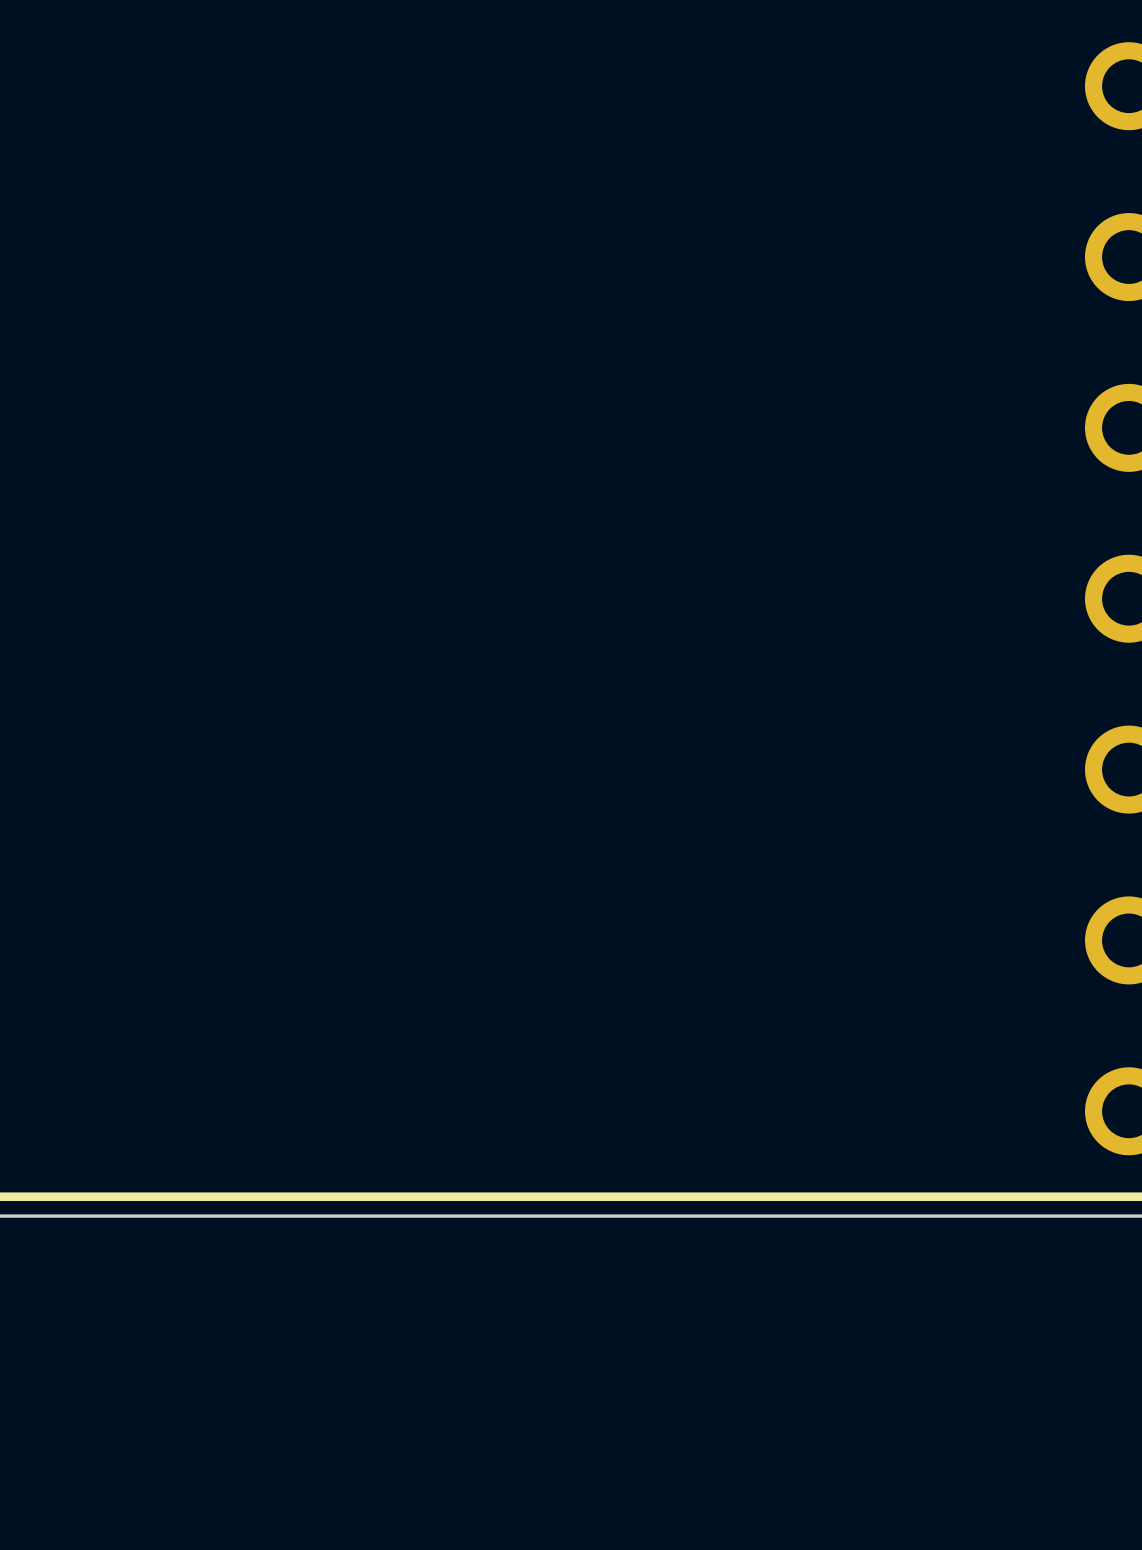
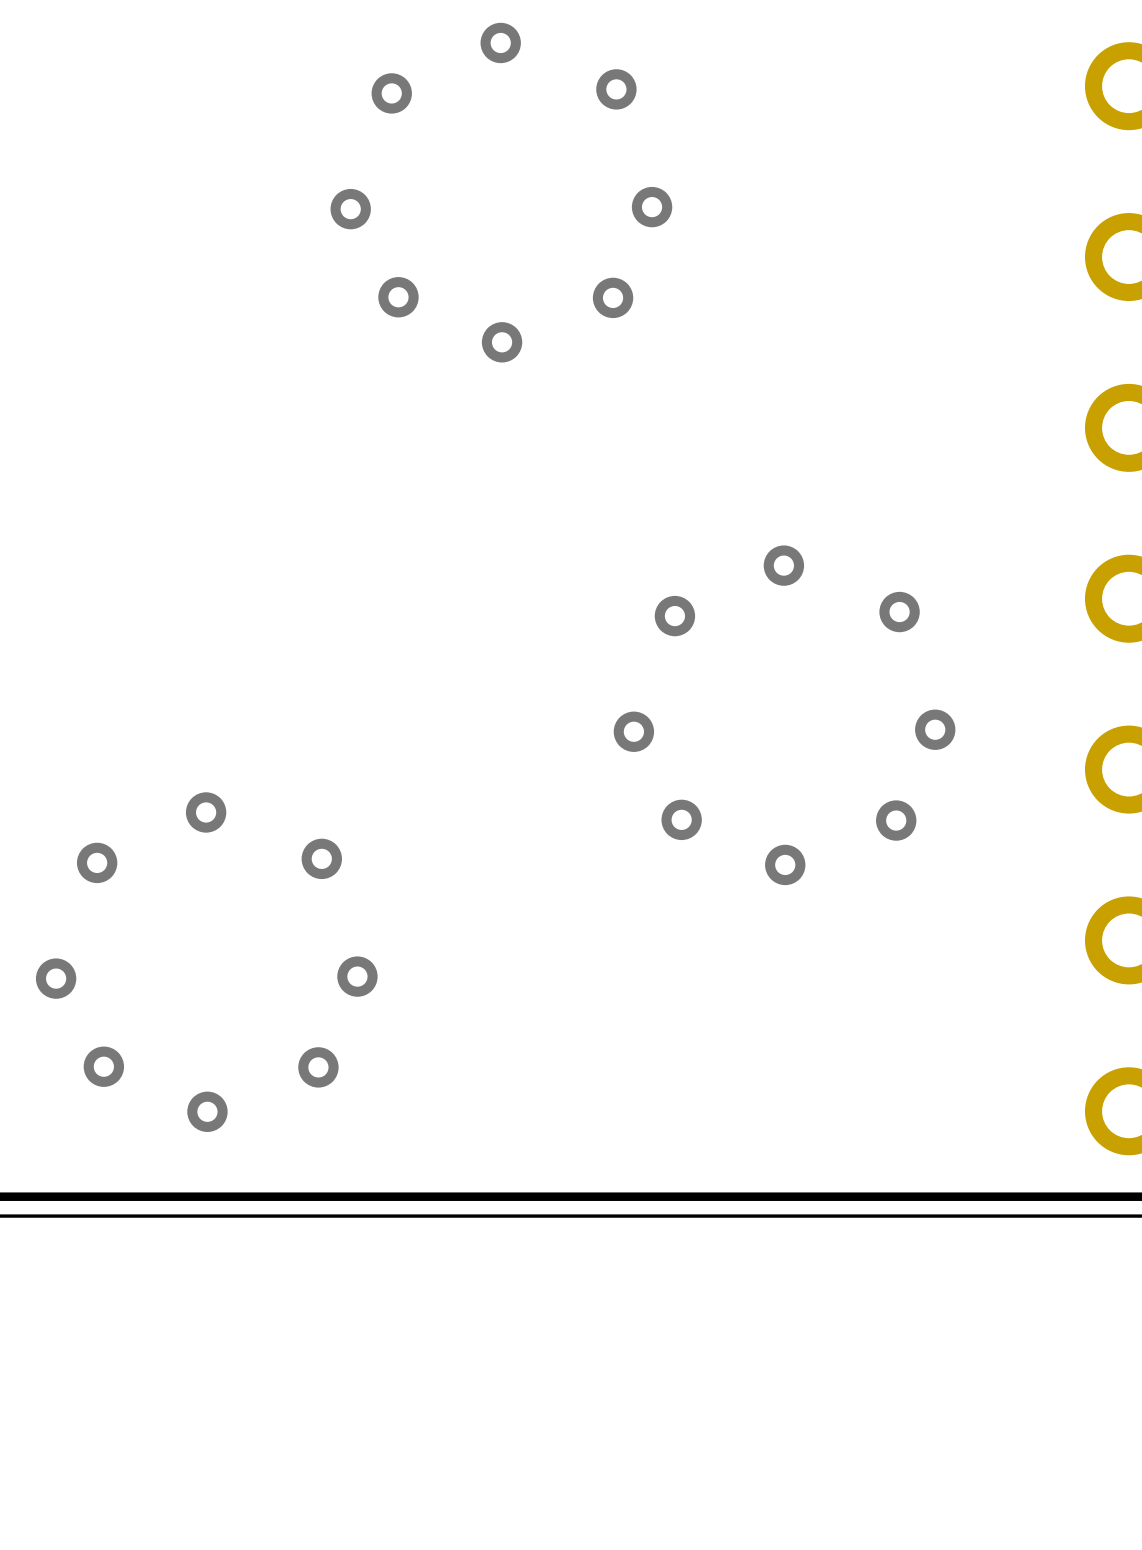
via: none -> (500, 42)
via: none -> (616, 89)
via: none -> (391, 93)
via: none -> (652, 207)
via: none -> (350, 209)
via: none -> (398, 297)
via: none -> (613, 297)
via: none -> (502, 342)
via: none -> (783, 565)
via: none -> (899, 612)
via: none -> (674, 616)
via: none -> (935, 729)
via: none -> (633, 731)
via: none -> (206, 812)
via: none -> (681, 819)
via: none -> (896, 820)
via: none -> (321, 858)
via: none -> (97, 862)
via: none -> (785, 864)
via: none -> (357, 976)
via: none -> (56, 978)
via: none -> (103, 1066)
via: none -> (318, 1067)
via: none -> (207, 1111)

